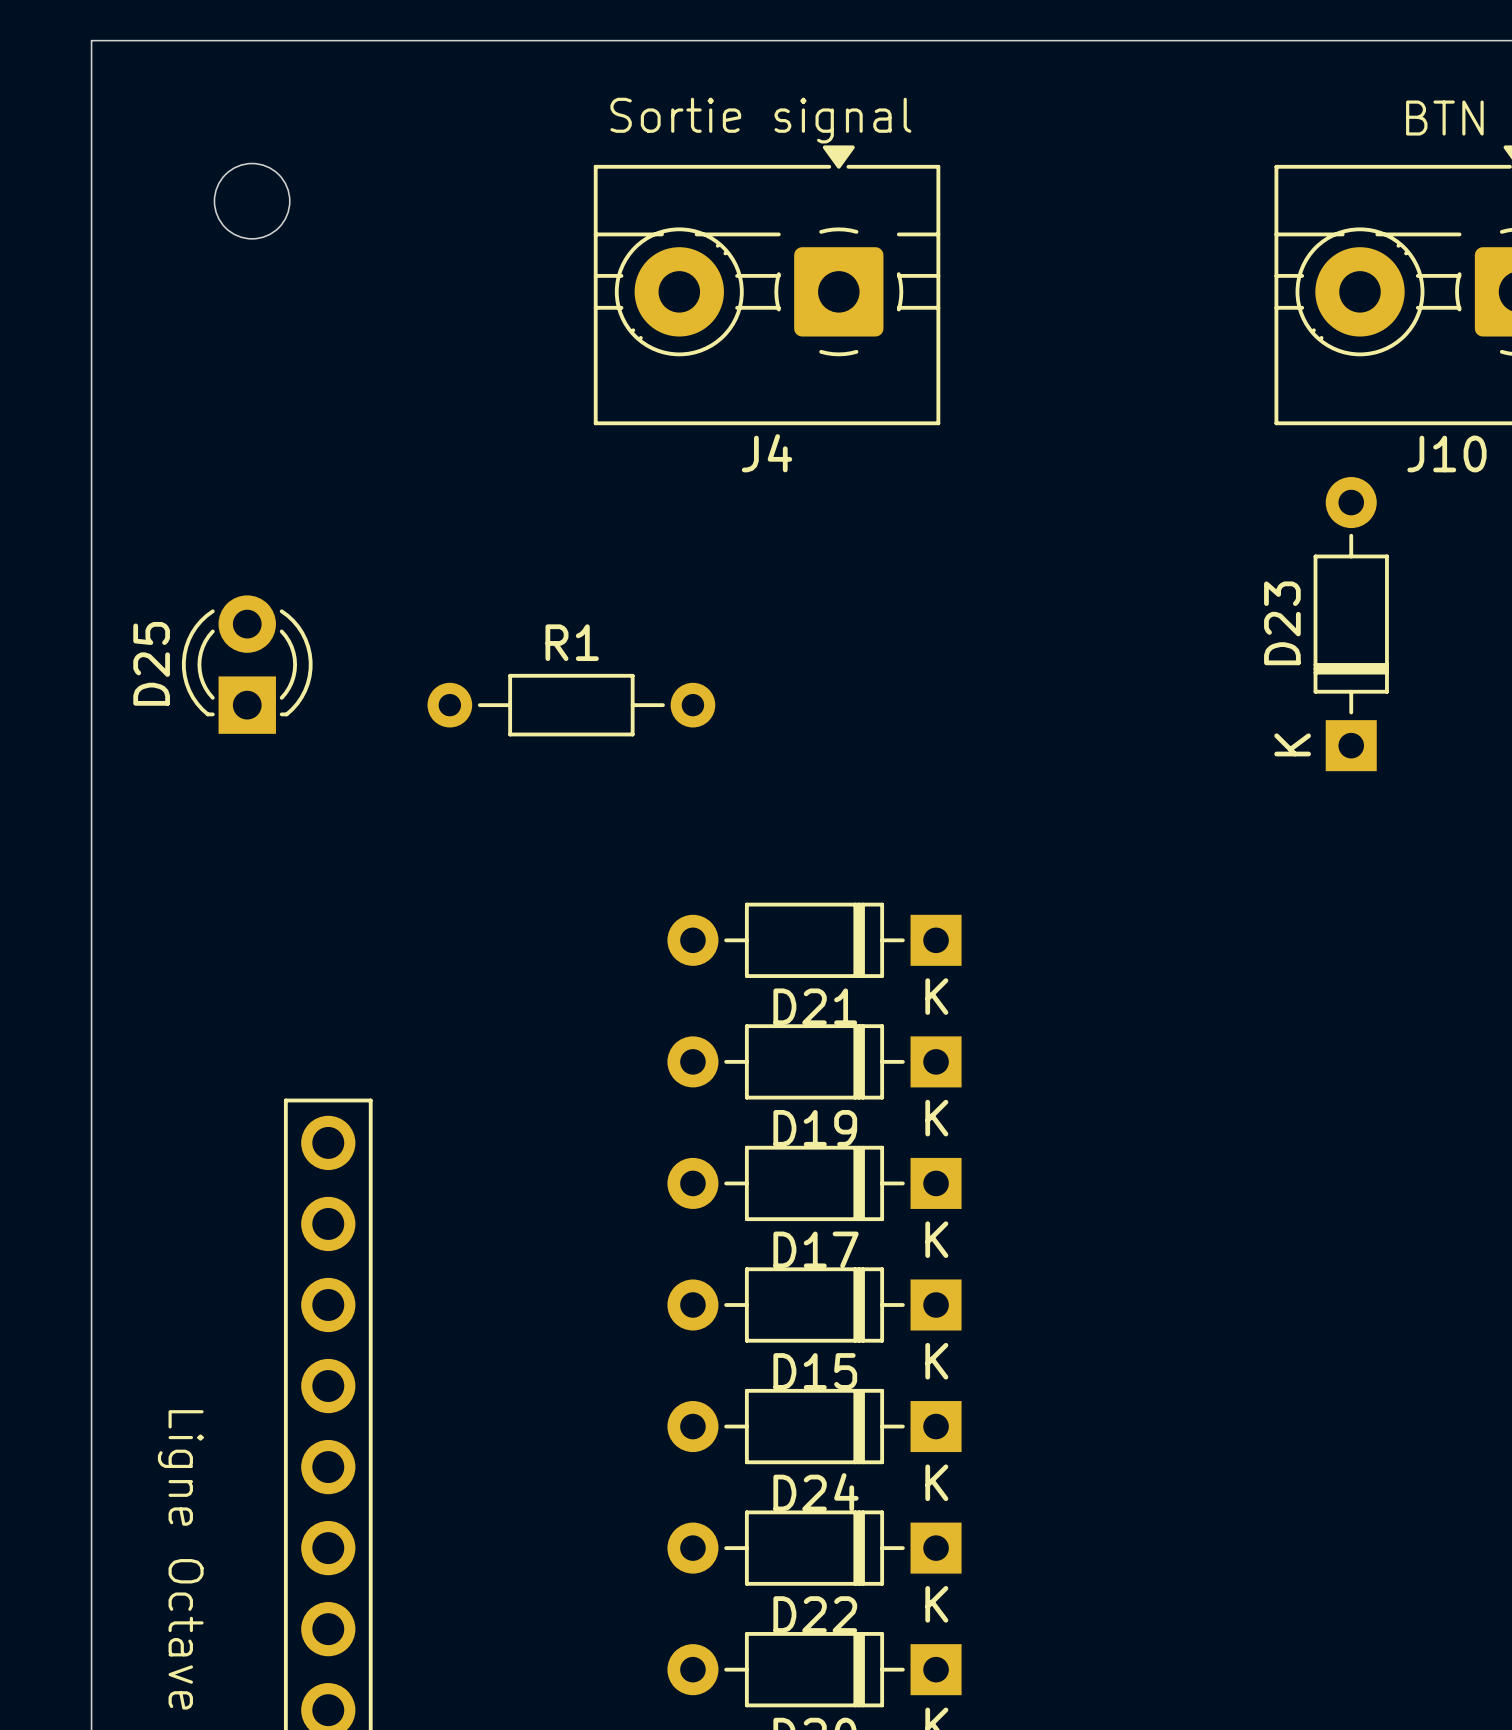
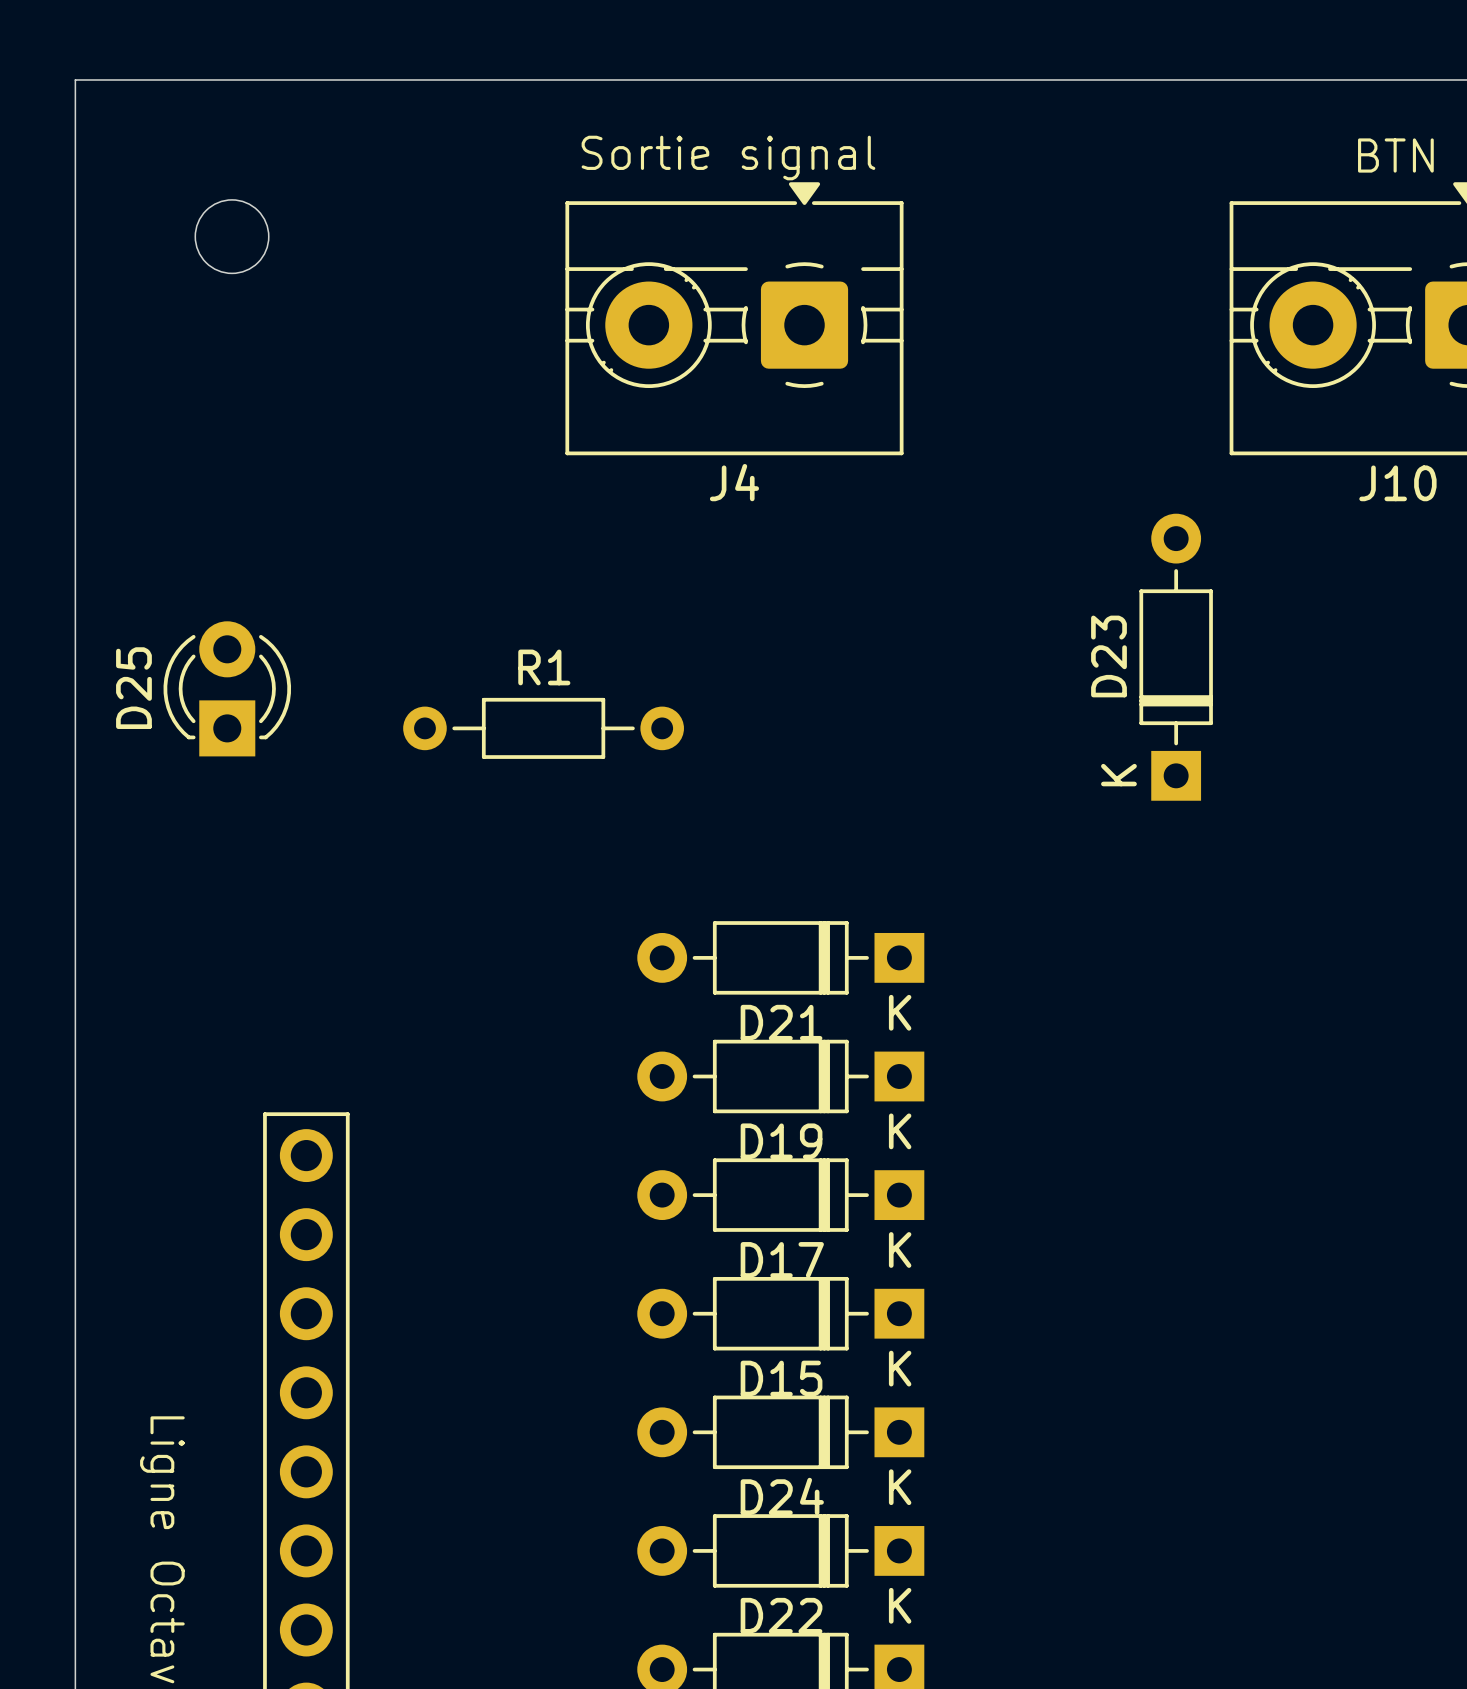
D23 position: (1351, 624) -> (1176, 657)

